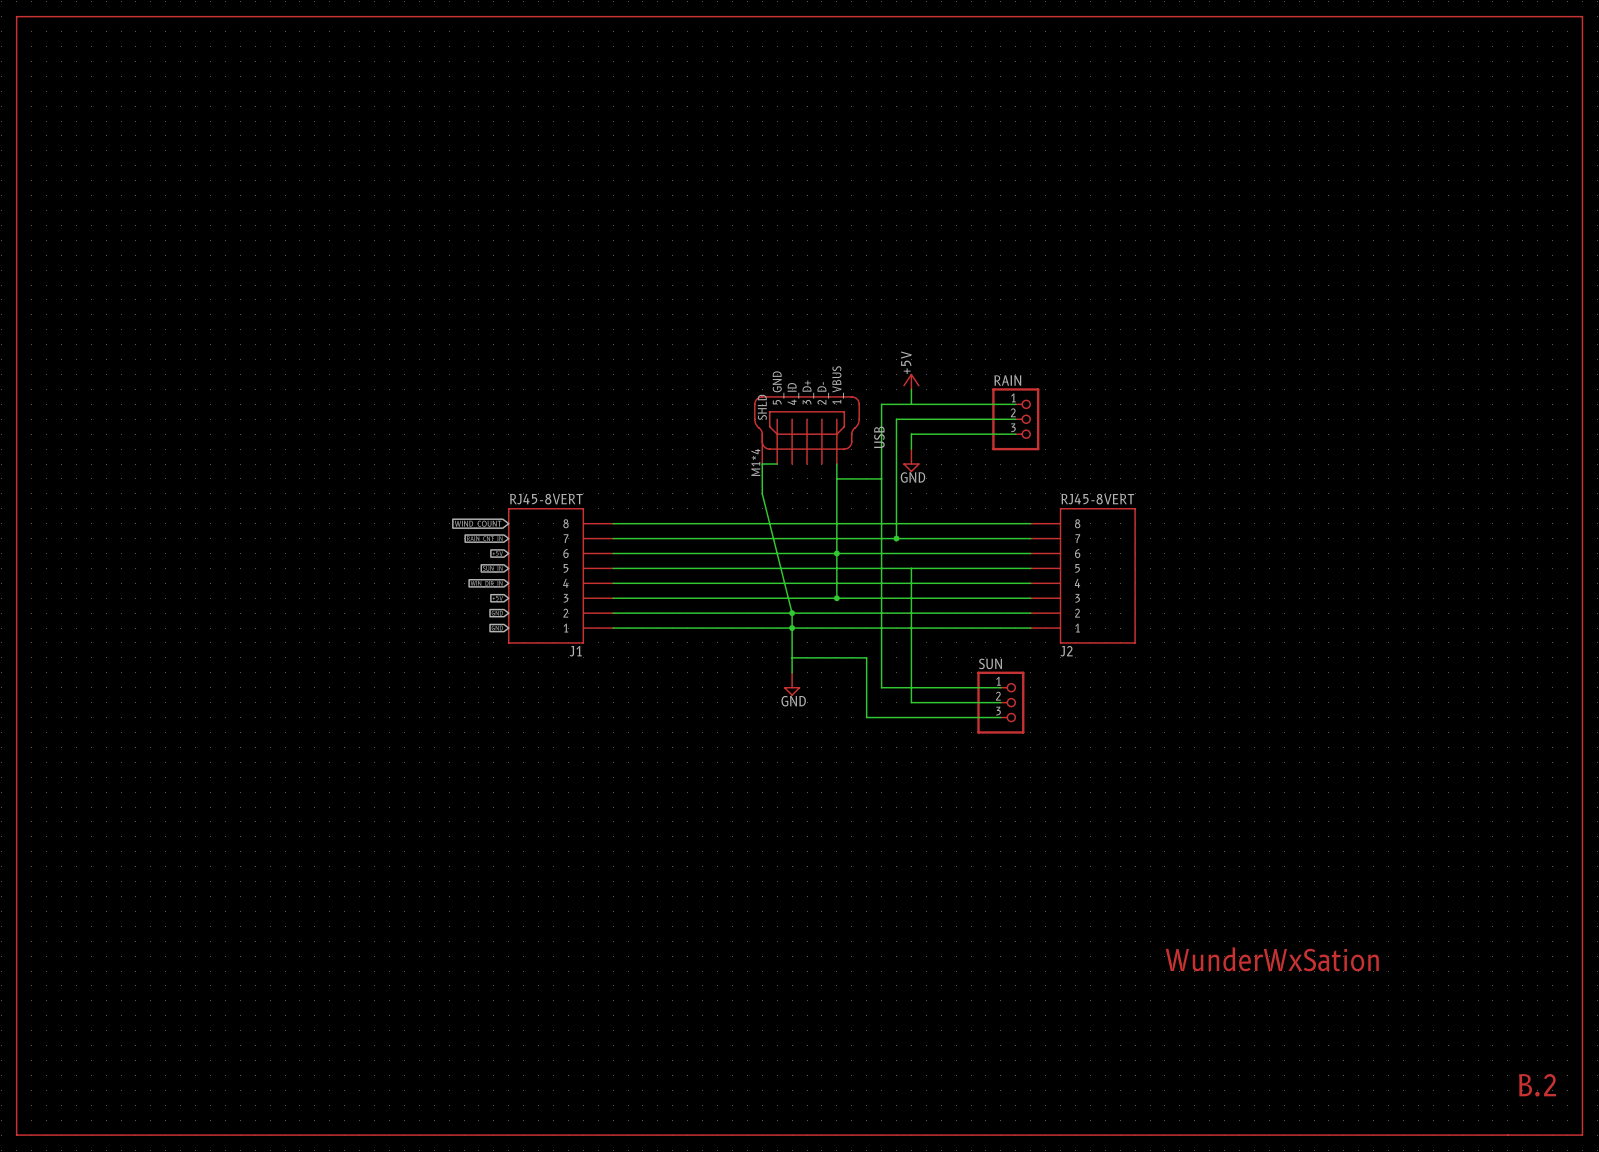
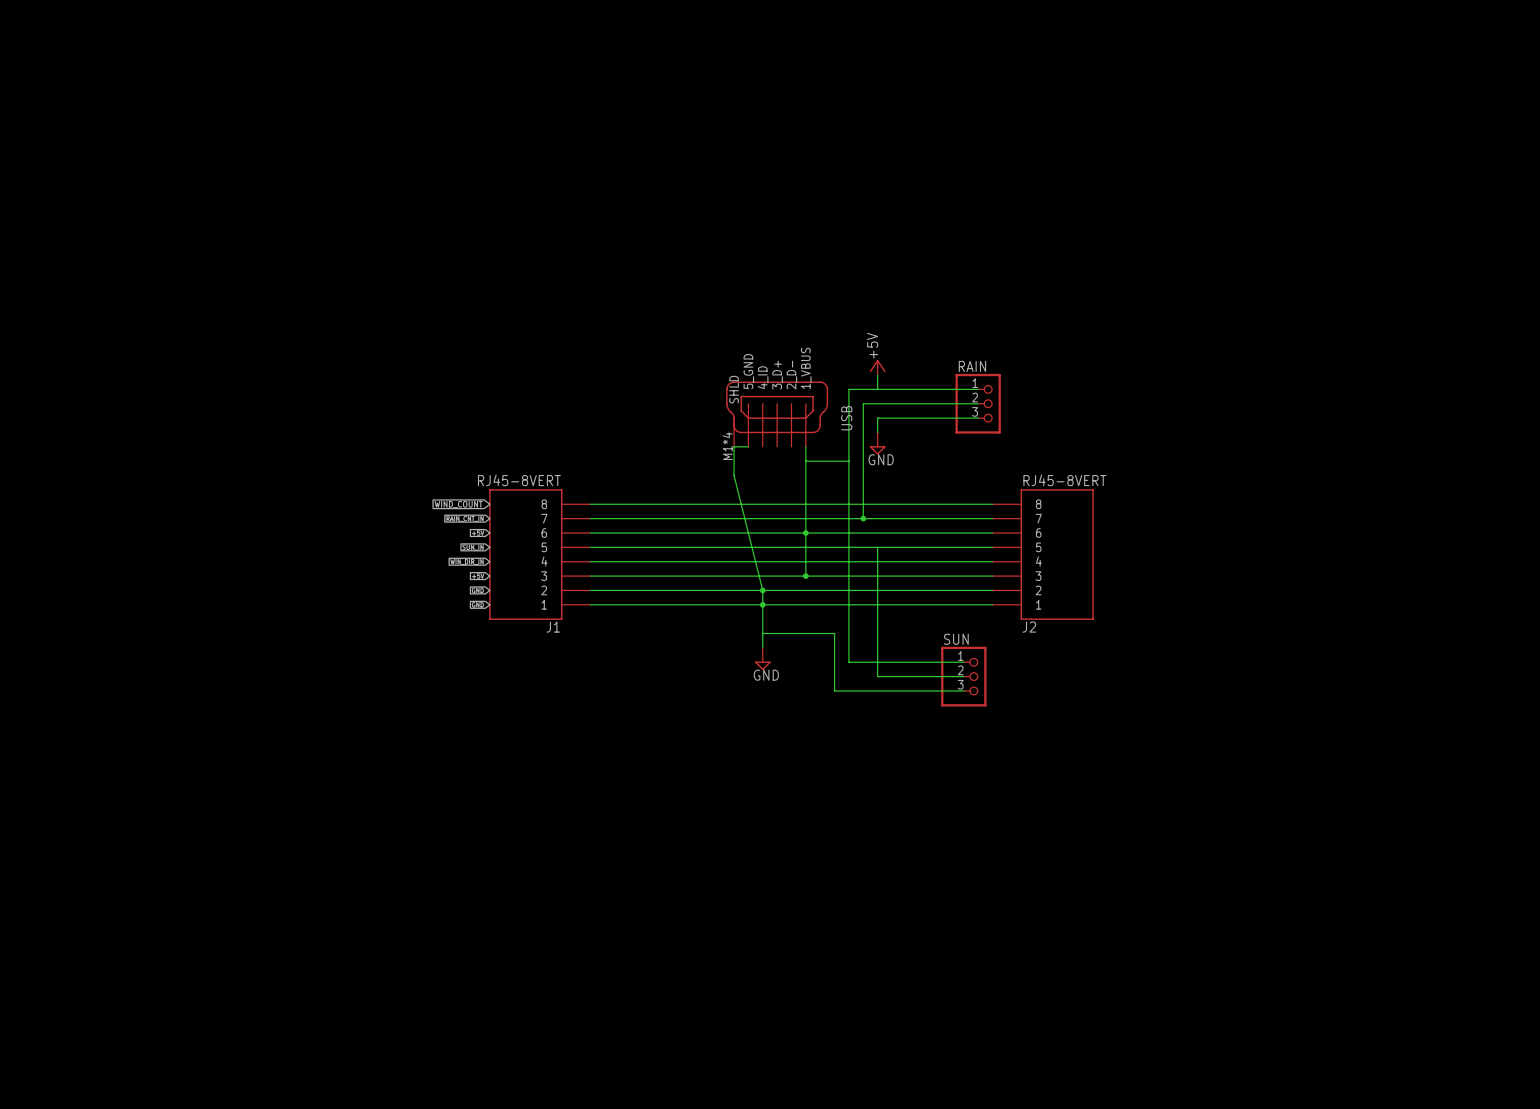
part: (799, 575) -> none
text: WunderWxSation (1272, 959) -> none
text: B.2 (1537, 1085) -> none

